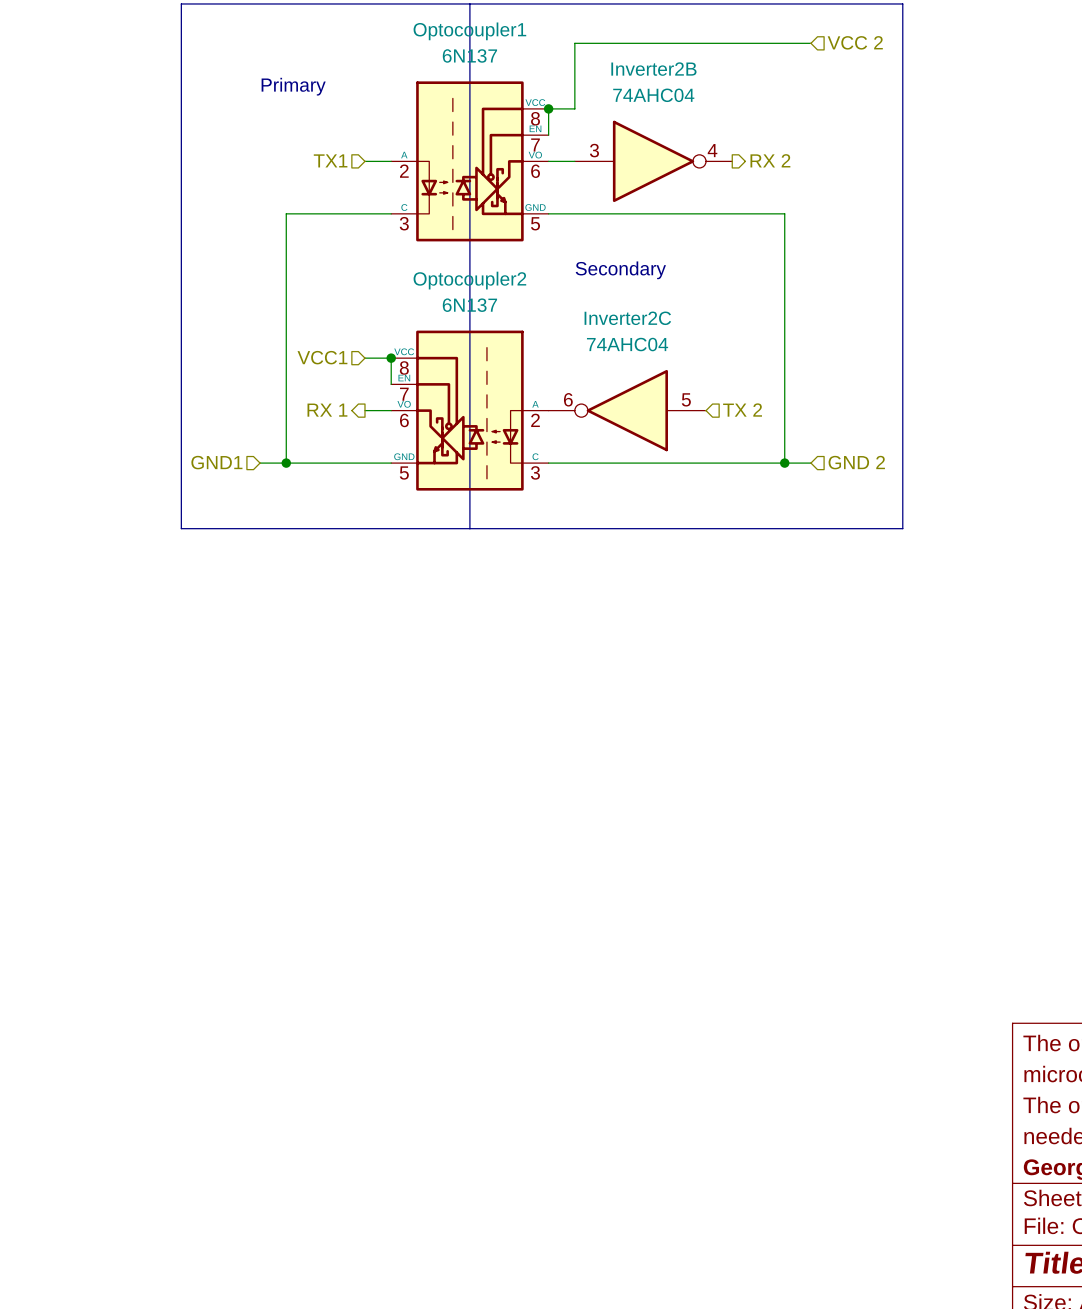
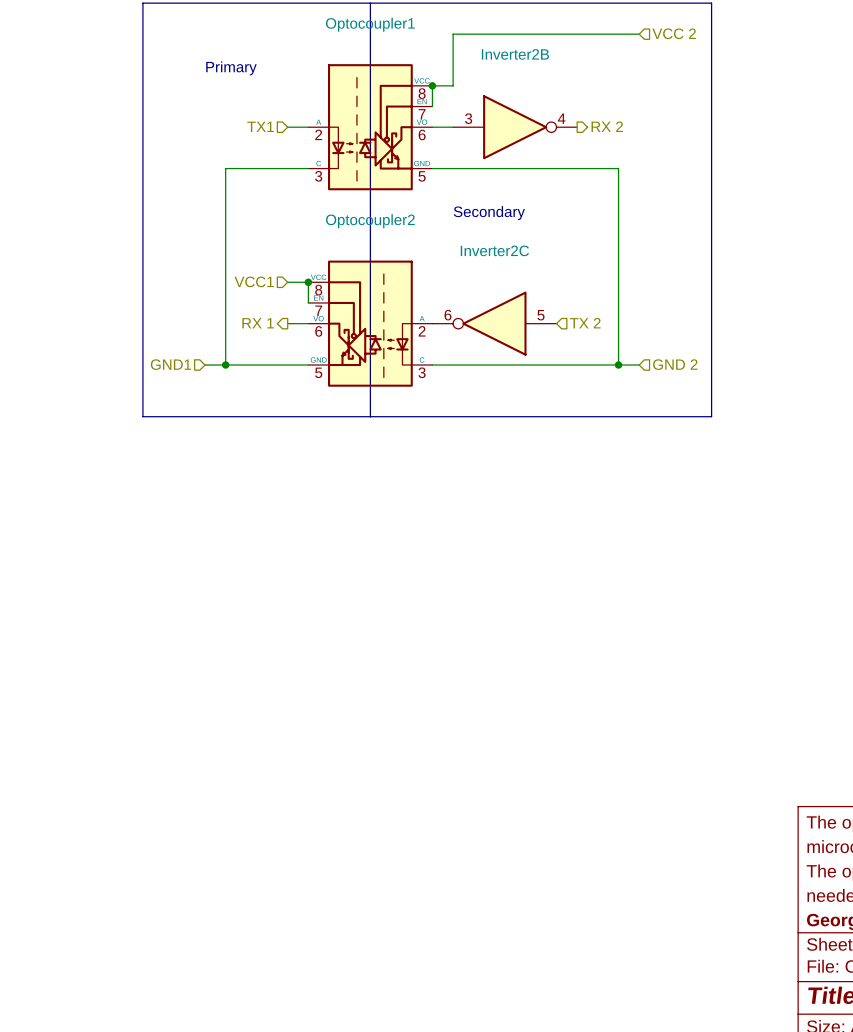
Optocoupler1 value: 6N137 (469, 55) -> none
Inverter2B value: 74AHC04 (653, 95) -> none
Optocoupler2 value: 6N137 (469, 305) -> none
Inverter2C value: 74AHC04 (627, 344) -> none

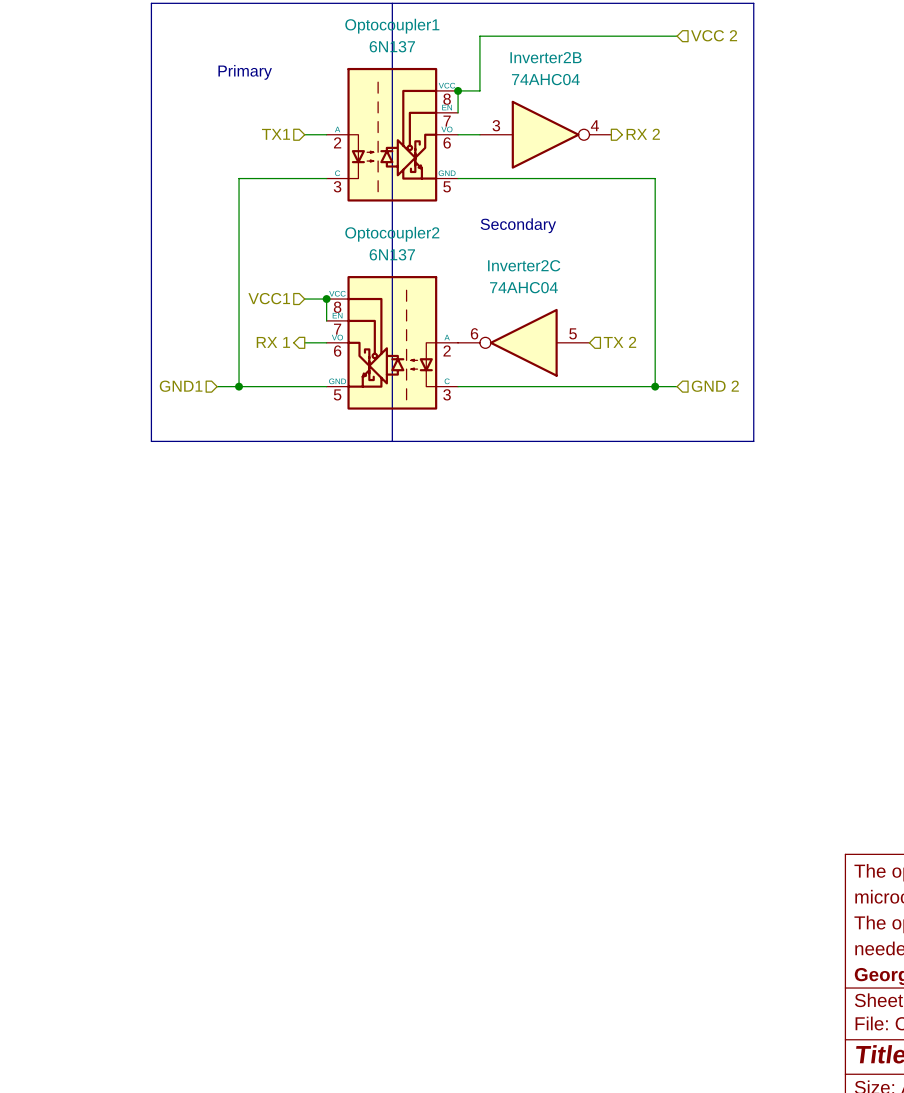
Optocoupler1 value: none -> 6N137 (392, 46)
Inverter2B value: none -> 74AHC04 (545, 79)
Optocoupler2 value: none -> 6N137 (392, 254)
Inverter2C value: none -> 74AHC04 (523, 287)

